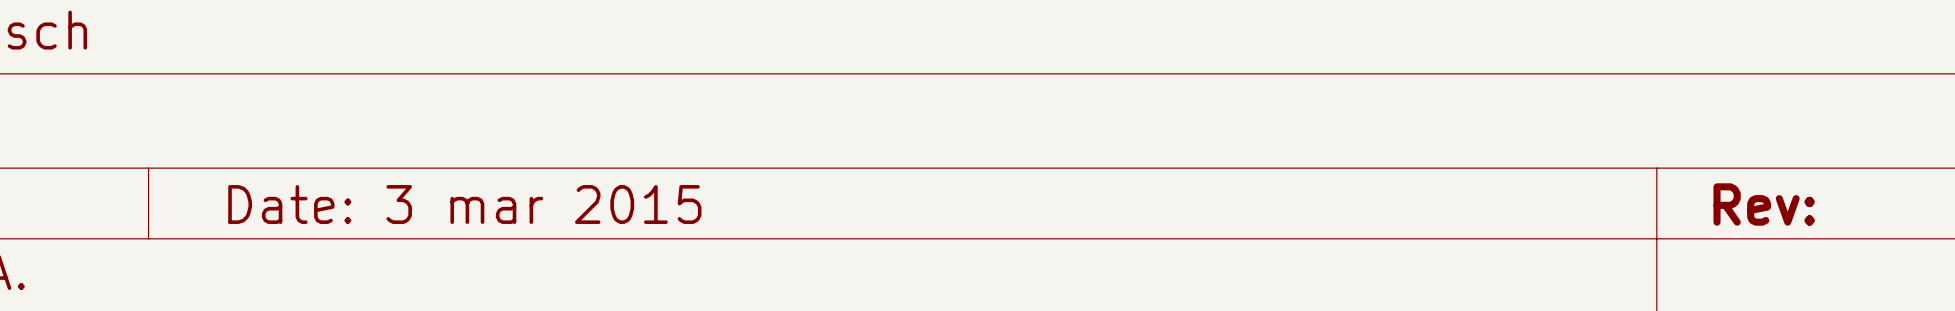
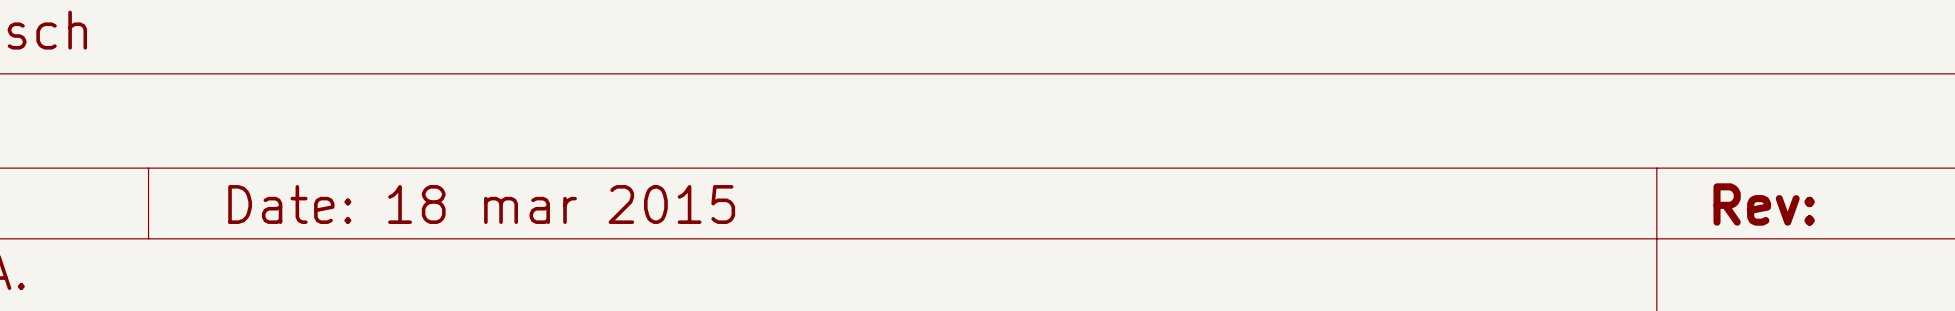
title block: Date: 3 mar 2015 (464, 204) -> Date: 18 mar 2015 (481, 204)

